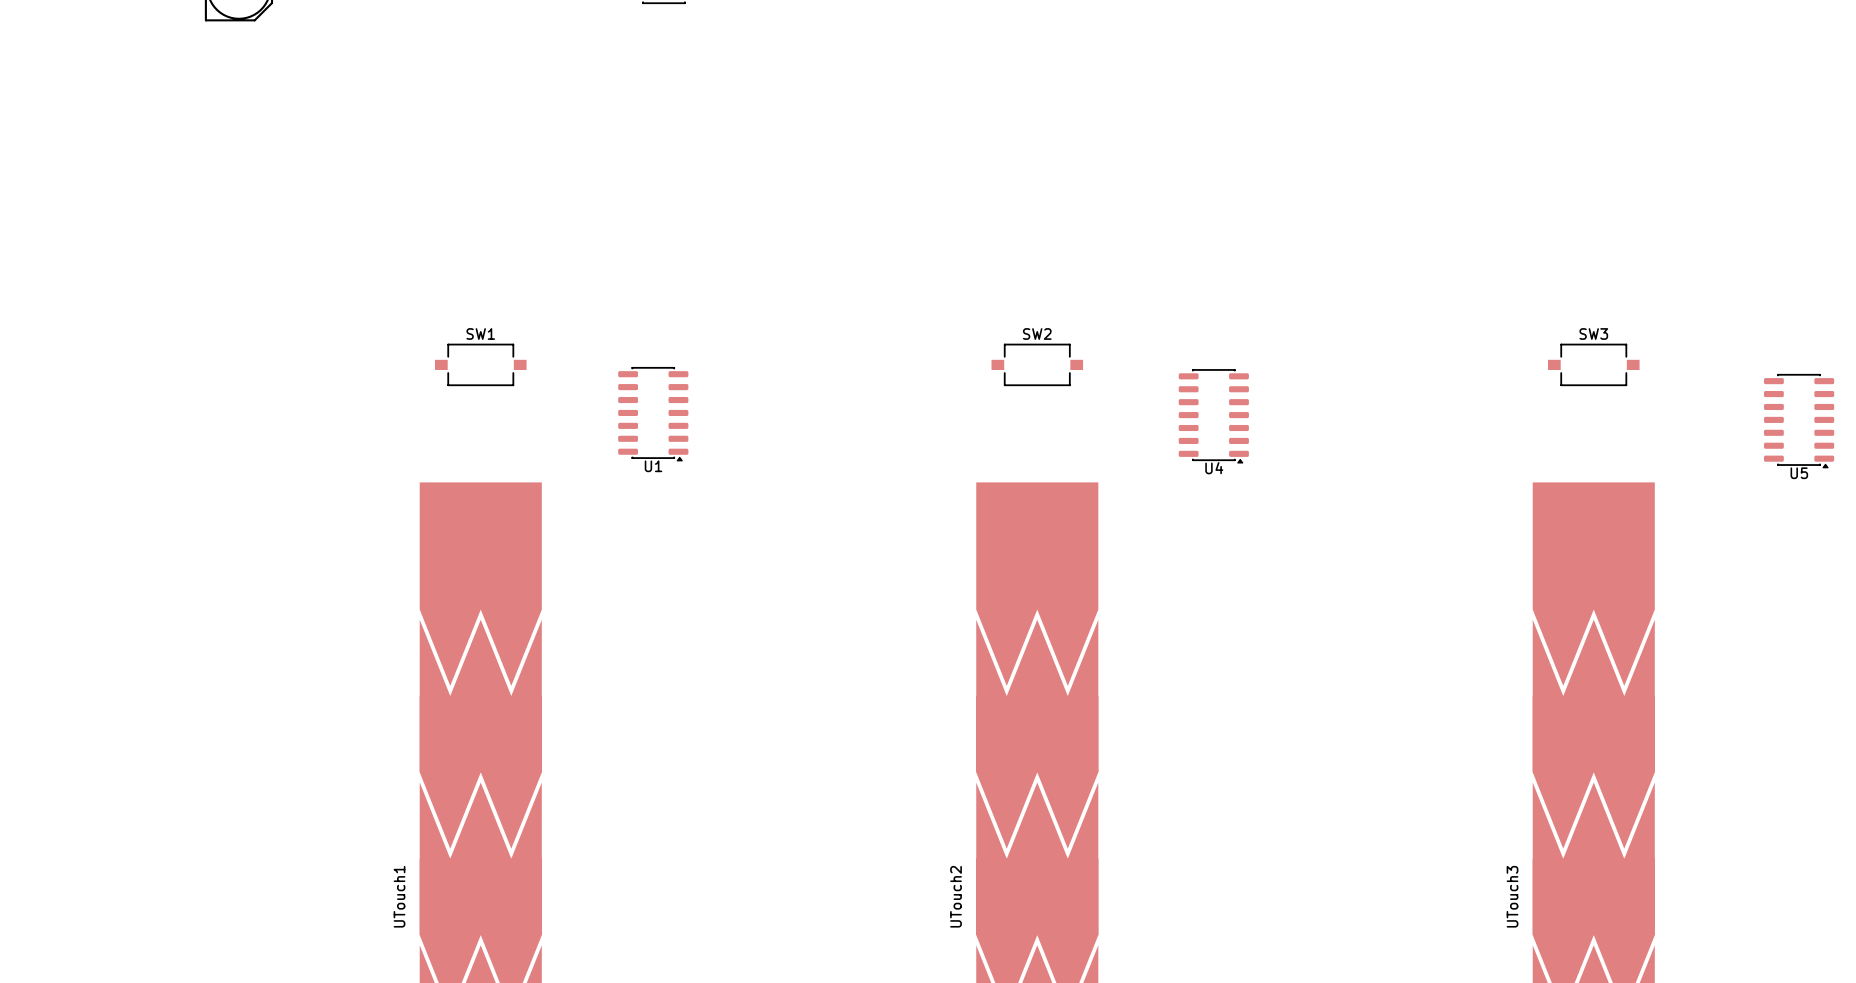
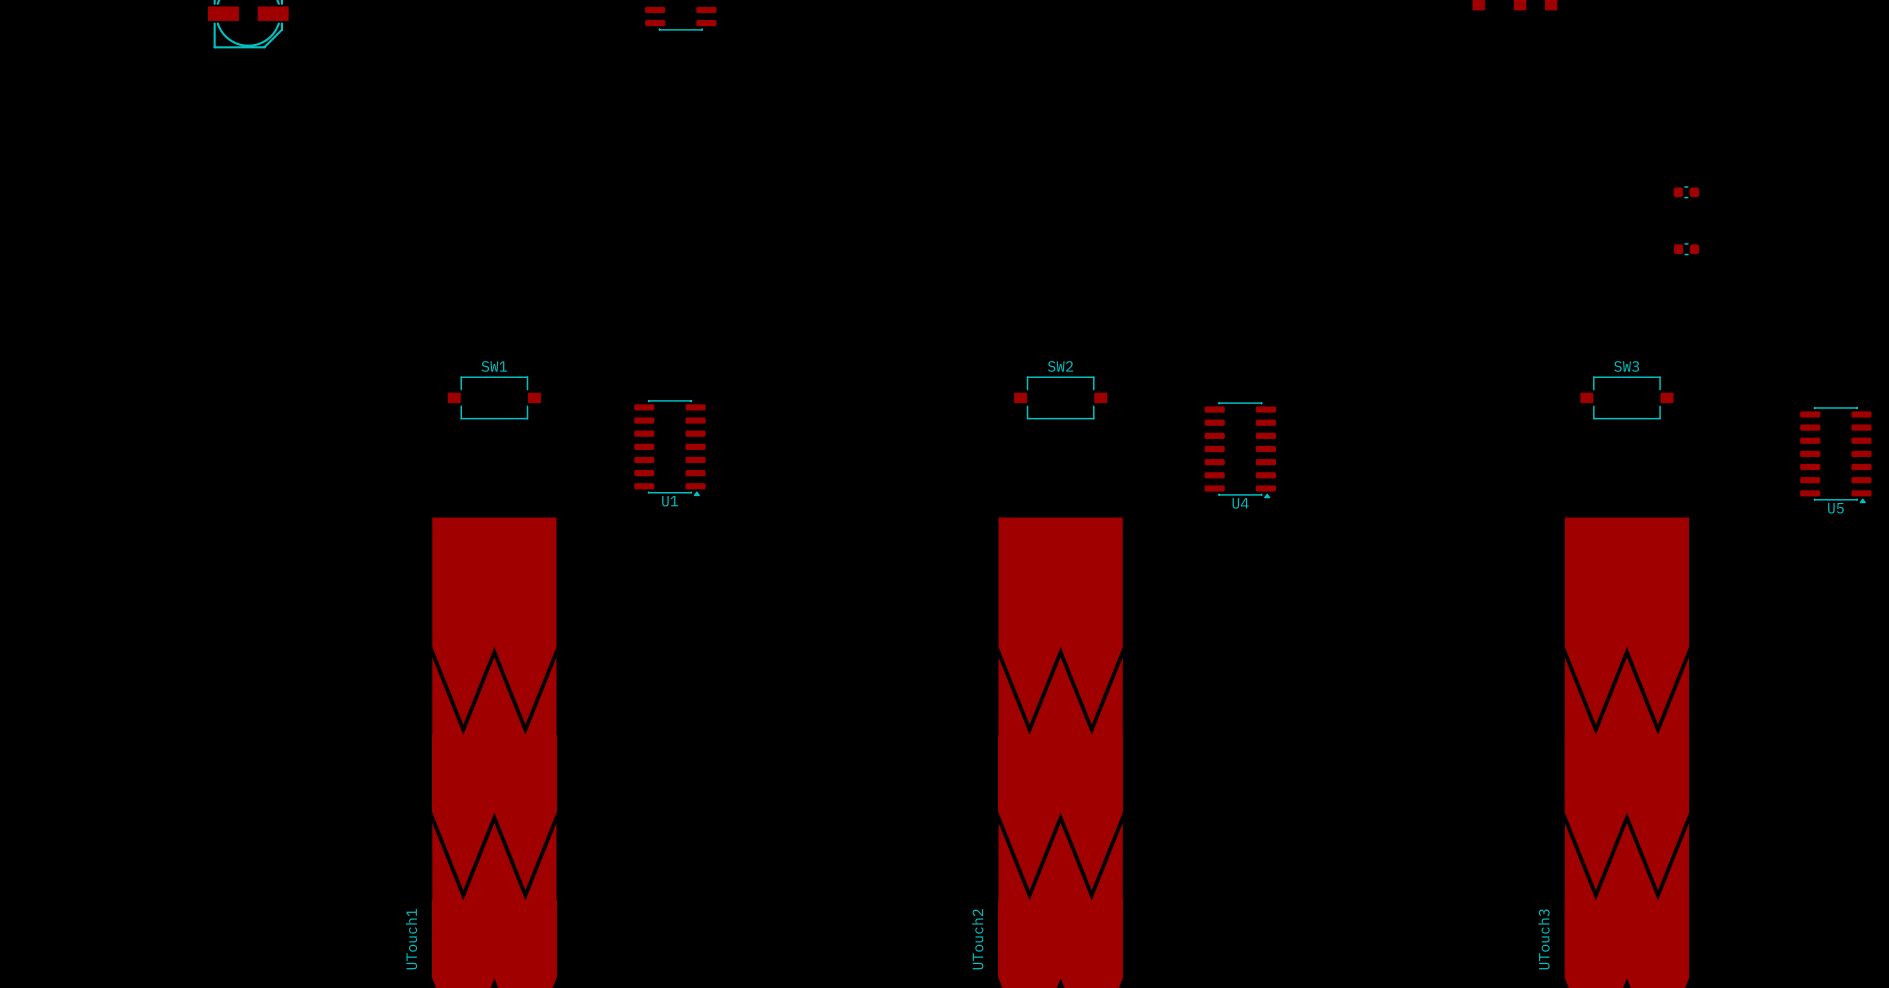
part: none -> (1686, 192)
part: none -> (1686, 249)

